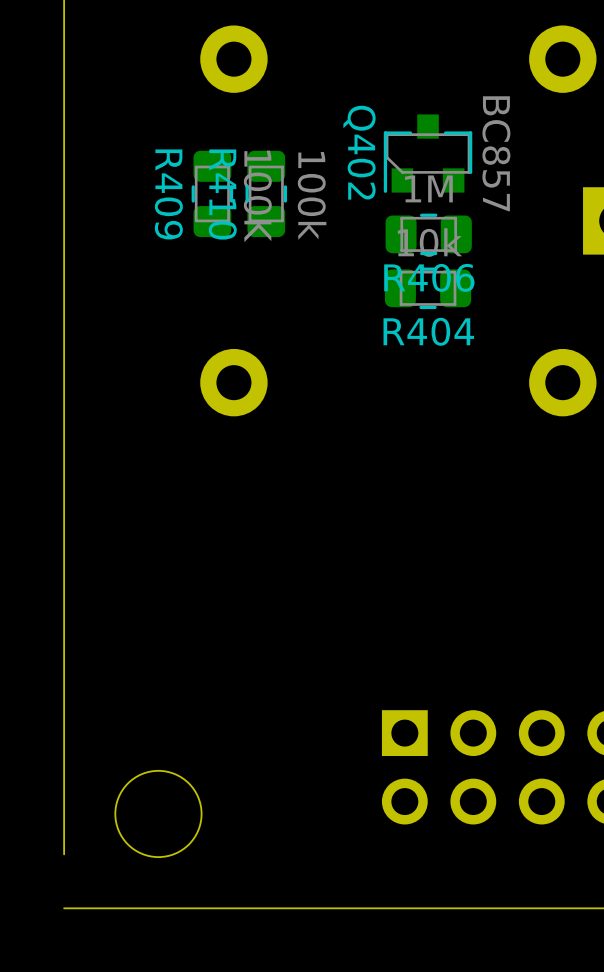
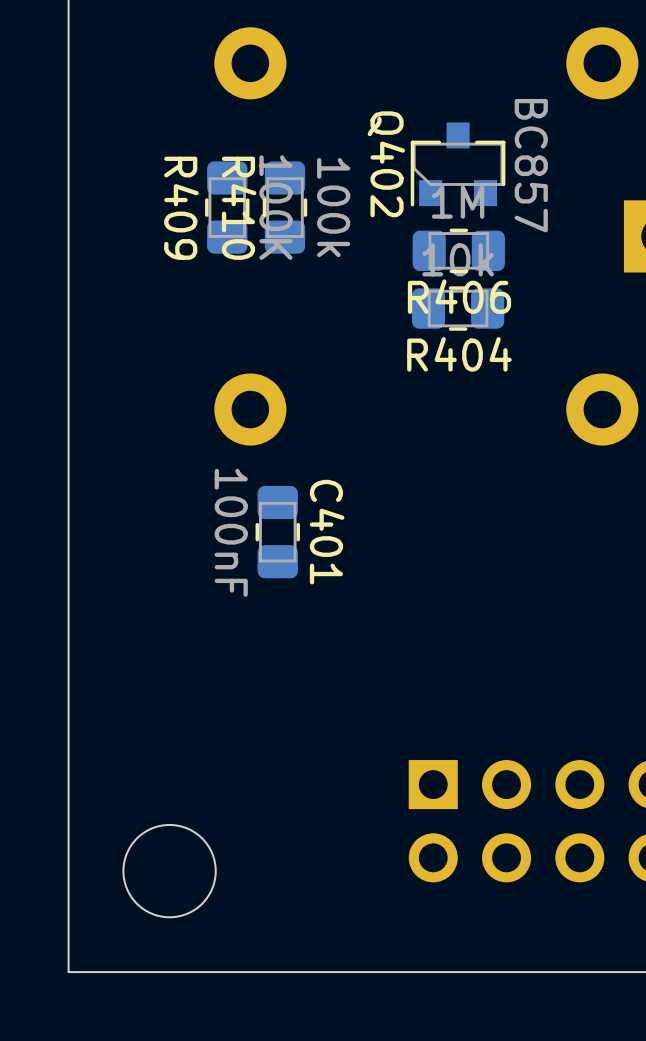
C401: none -> 100nF (277, 532)
board edge: none -> (68, 914) (68, 972)

